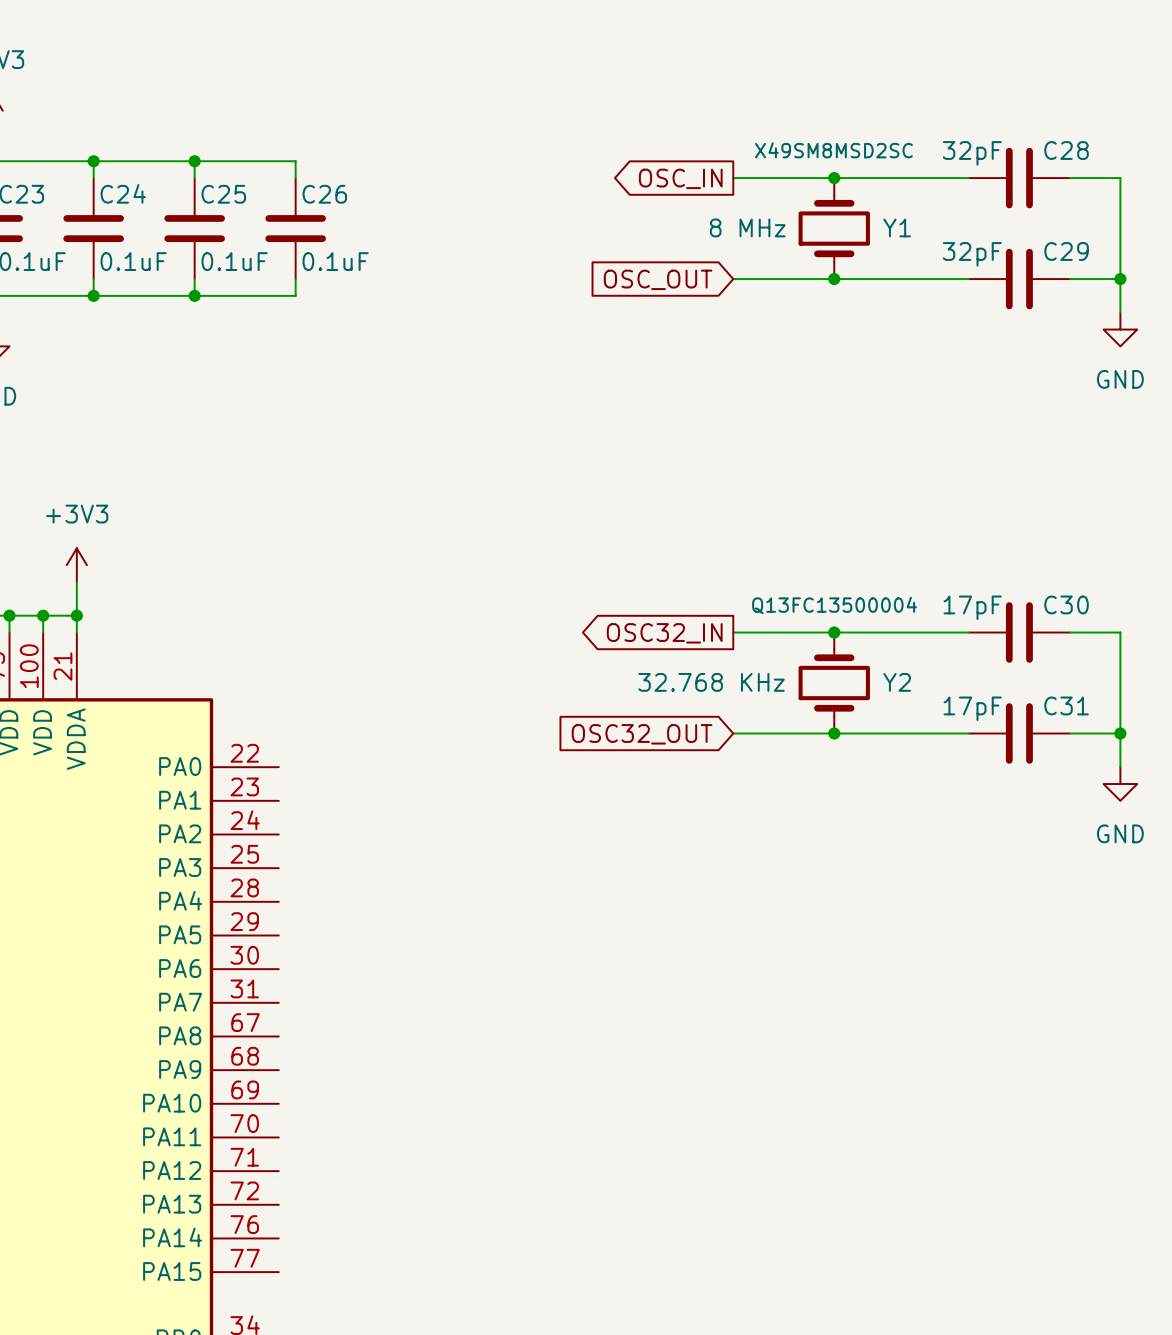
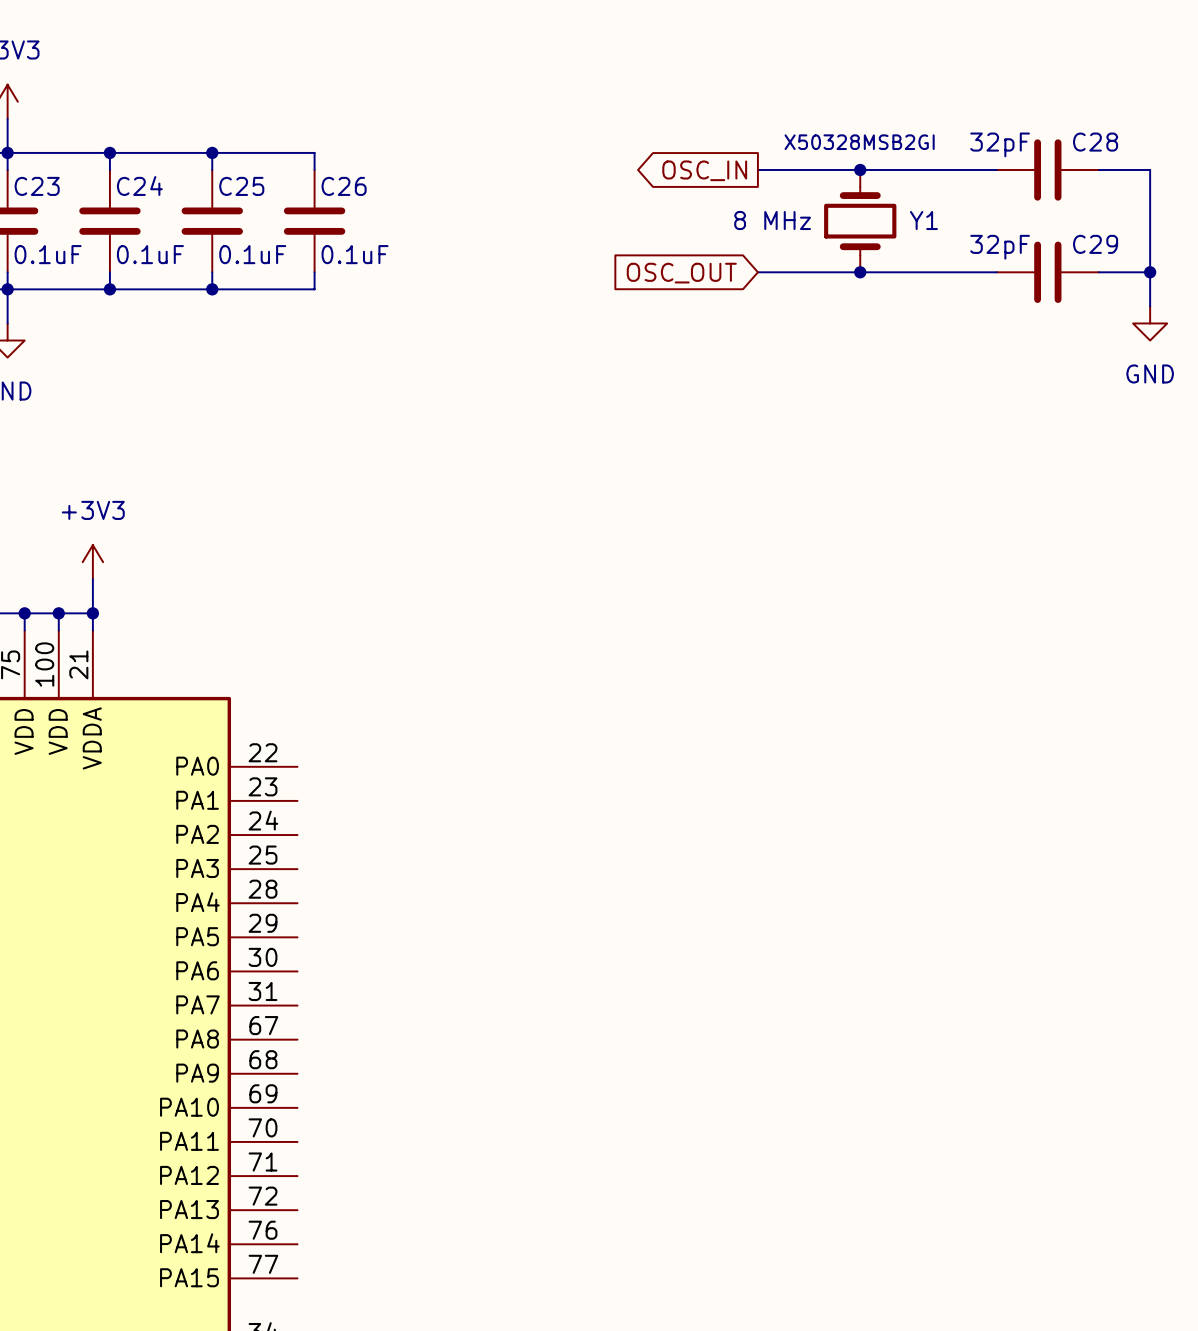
Y1 text: X49SM8MSD2SC (833, 150) -> X50328MSB2GI (859, 142)
wire: (733, 632) (968, 632) -> none
junction: (834, 632) -> none
C30: 17pF (1019, 632) -> none
wire: (1069, 632) (1120, 632) (1120, 767) -> none
global label: OSC32_IN (664, 633) -> none
Y2: 32.768 KHz (834, 683) -> none
wire: (733, 733) (968, 733) -> none
junction: (834, 733) -> none
C31: 17pF (1019, 733) -> none
wire: (1069, 733) (1120, 733) -> none
junction: (1120, 733) -> none
global label: OSC32_OUT (642, 734) -> none
power symbol: GND (1120, 784) -> none

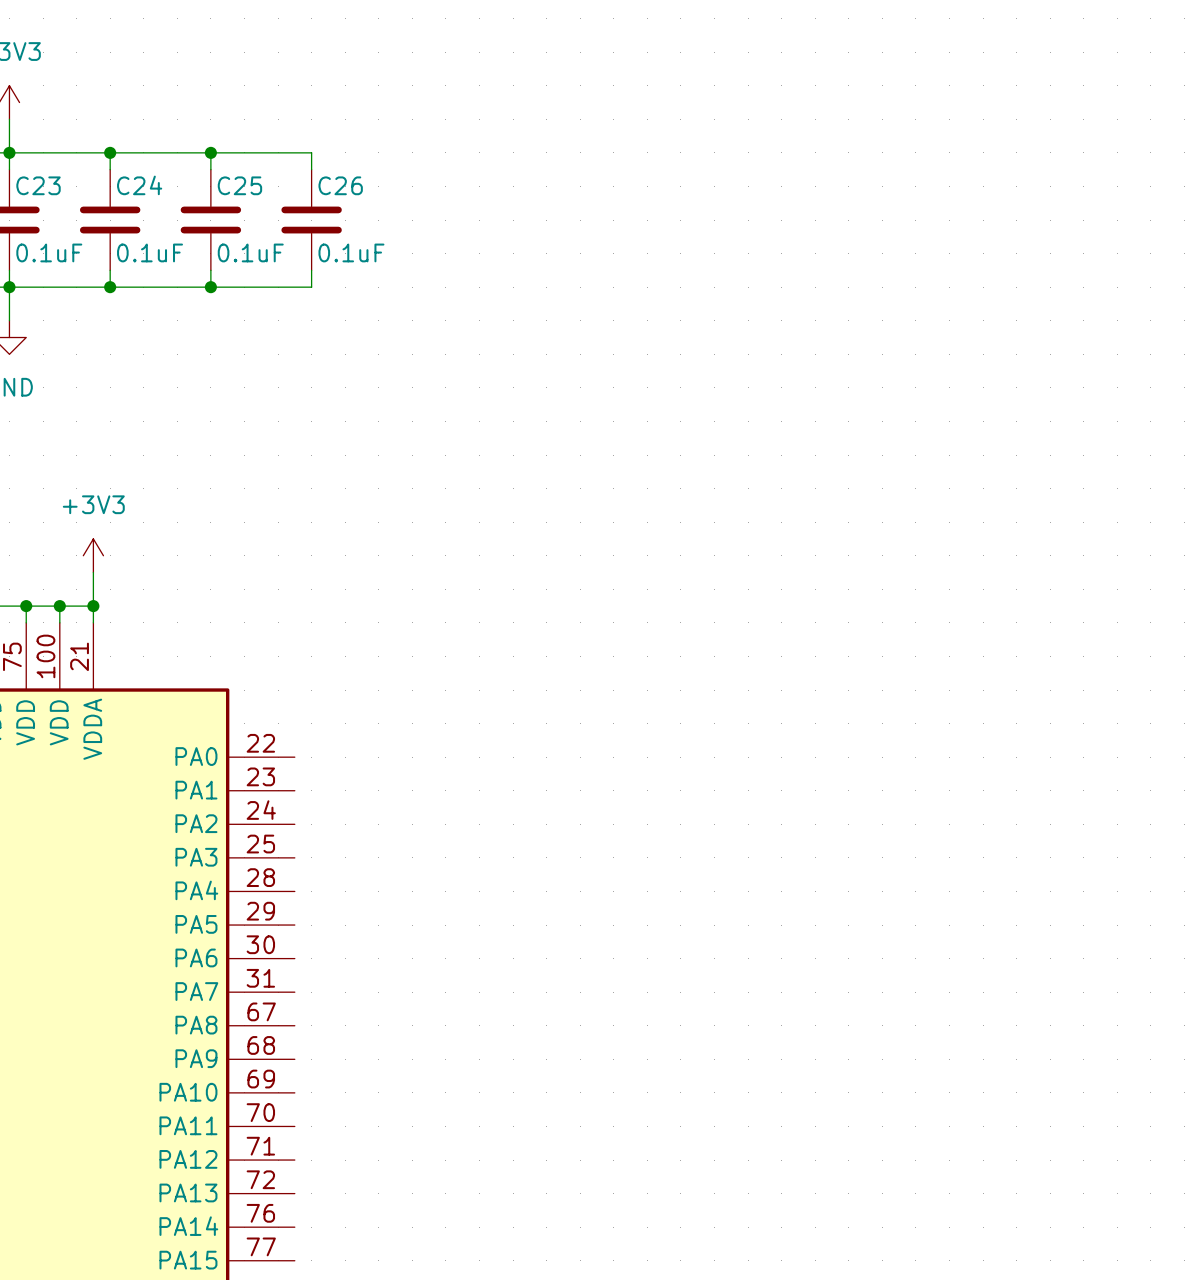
wire: (757, 169) (996, 169) -> none
junction: (860, 169) -> none
C28: 32pF (1047, 169) -> none
wire: (1098, 169) (1150, 169) (1150, 306) -> none
global label: OSC_IN (704, 170) -> none
Y1: 8 MHz (860, 221) -> none
wire: (757, 272) (996, 272) -> none
junction: (860, 272) -> none
C29: 32pF (1047, 272) -> none
wire: (1098, 272) (1150, 272) -> none
junction: (1150, 272) -> none
global label: OSC_OUT (681, 273) -> none
power symbol: GND (1150, 323) -> none

